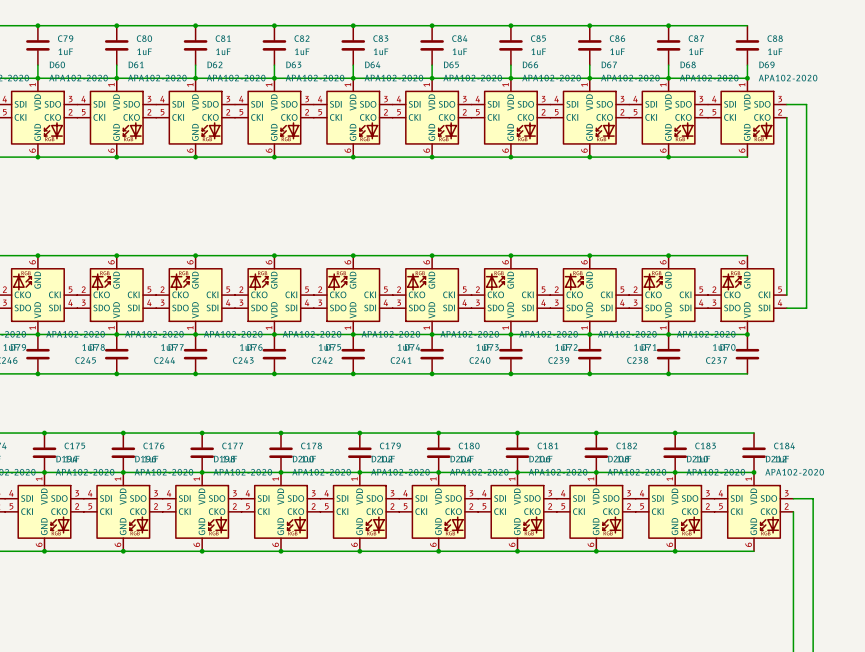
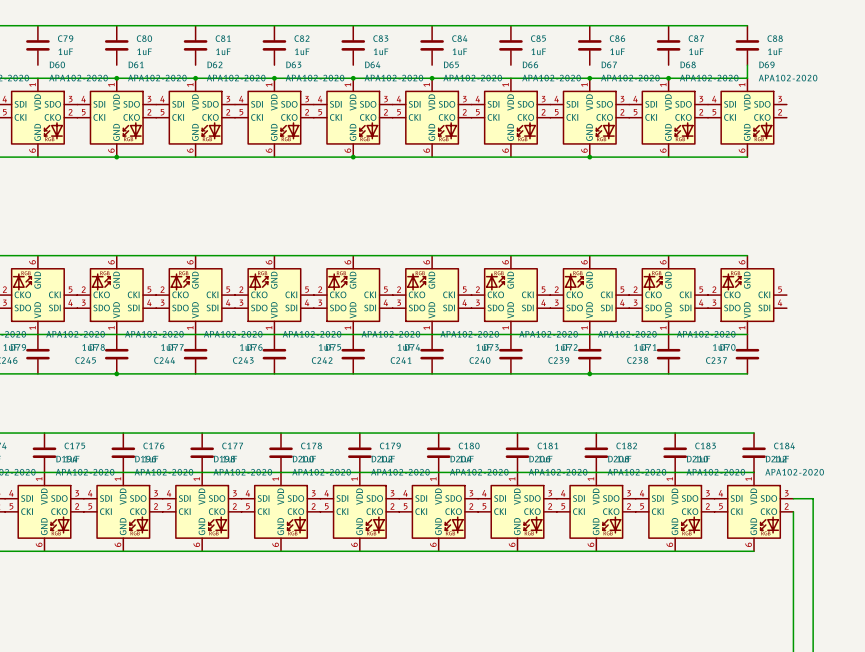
junction: (37, 25) -> none
junction: (116, 25) -> none
junction: (195, 25) -> none
junction: (274, 25) -> none
junction: (353, 25) -> none
junction: (432, 25) -> none
junction: (510, 25) -> none
junction: (589, 25) -> none
junction: (668, 25) -> none
wire: (37, 65) (37, 78) -> none
wire: (116, 65) (116, 78) -> none
wire: (195, 65) (195, 78) -> none
wire: (274, 65) (274, 78) -> none
wire: (353, 65) (353, 78) -> none
wire: (432, 65) (432, 78) -> none
wire: (510, 65) (510, 78) -> none
wire: (589, 65) (589, 78) -> none
wire: (668, 65) (668, 78) -> none
junction: (37, 78) -> none
junction: (510, 78) -> none
junction: (747, 78) -> none
wire: (786, 104) (806, 104) (806, 308) (786, 308) -> none
wire: (786, 117) (786, 295) -> none
junction: (37, 157) -> none
junction: (195, 157) -> none
junction: (274, 157) -> none
junction: (432, 157) -> none
junction: (510, 157) -> none
junction: (668, 157) -> none
junction: (37, 255) -> none
junction: (116, 255) -> none
junction: (195, 255) -> none
junction: (274, 255) -> none
junction: (353, 255) -> none
junction: (432, 255) -> none
junction: (510, 255) -> none
junction: (589, 255) -> none
junction: (668, 255) -> none
junction: (37, 334) -> none
junction: (116, 334) -> none
junction: (195, 334) -> none
junction: (274, 334) -> none
junction: (353, 334) -> none
junction: (432, 334) -> none
junction: (510, 334) -> none
junction: (589, 334) -> none
junction: (668, 334) -> none
junction: (747, 334) -> none
junction: (37, 373) -> none
junction: (195, 373) -> none
junction: (274, 373) -> none
junction: (353, 373) -> none
junction: (432, 373) -> none
junction: (510, 373) -> none
junction: (668, 373) -> none
junction: (44, 433) -> none
junction: (123, 433) -> none
junction: (202, 433) -> none
junction: (281, 433) -> none
junction: (359, 433) -> none
junction: (438, 433) -> none
junction: (517, 433) -> none
junction: (596, 433) -> none
junction: (675, 433) -> none
junction: (44, 472) -> none
junction: (123, 472) -> none
junction: (202, 472) -> none
junction: (281, 472) -> none
junction: (359, 472) -> none
junction: (438, 472) -> none
junction: (517, 472) -> none
junction: (596, 472) -> none
junction: (675, 472) -> none
junction: (754, 472) -> none
junction: (44, 551) -> none
junction: (123, 551) -> none
junction: (202, 551) -> none
junction: (281, 551) -> none
junction: (359, 551) -> none
junction: (438, 551) -> none
junction: (517, 551) -> none
junction: (596, 551) -> none
junction: (675, 551) -> none

